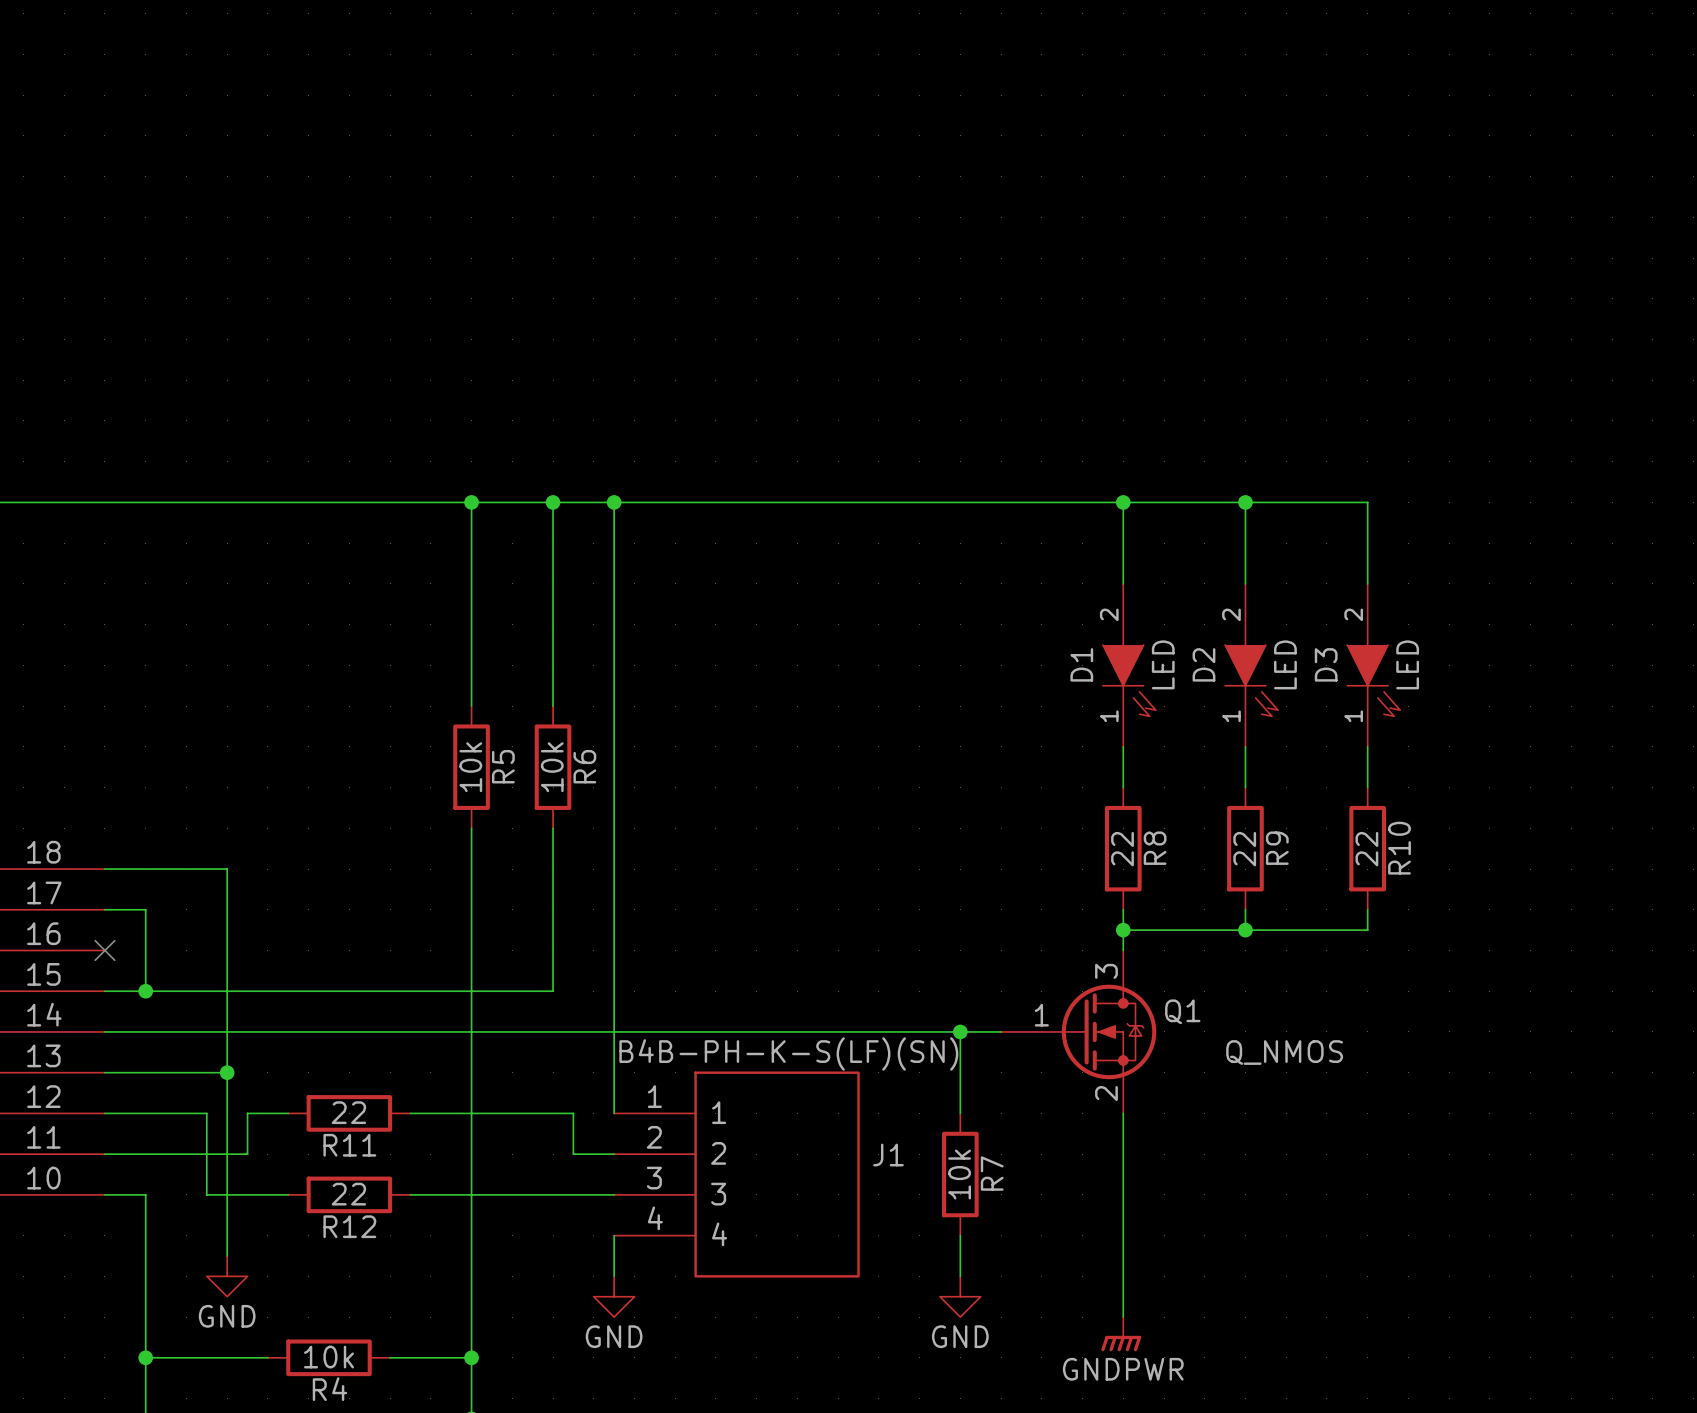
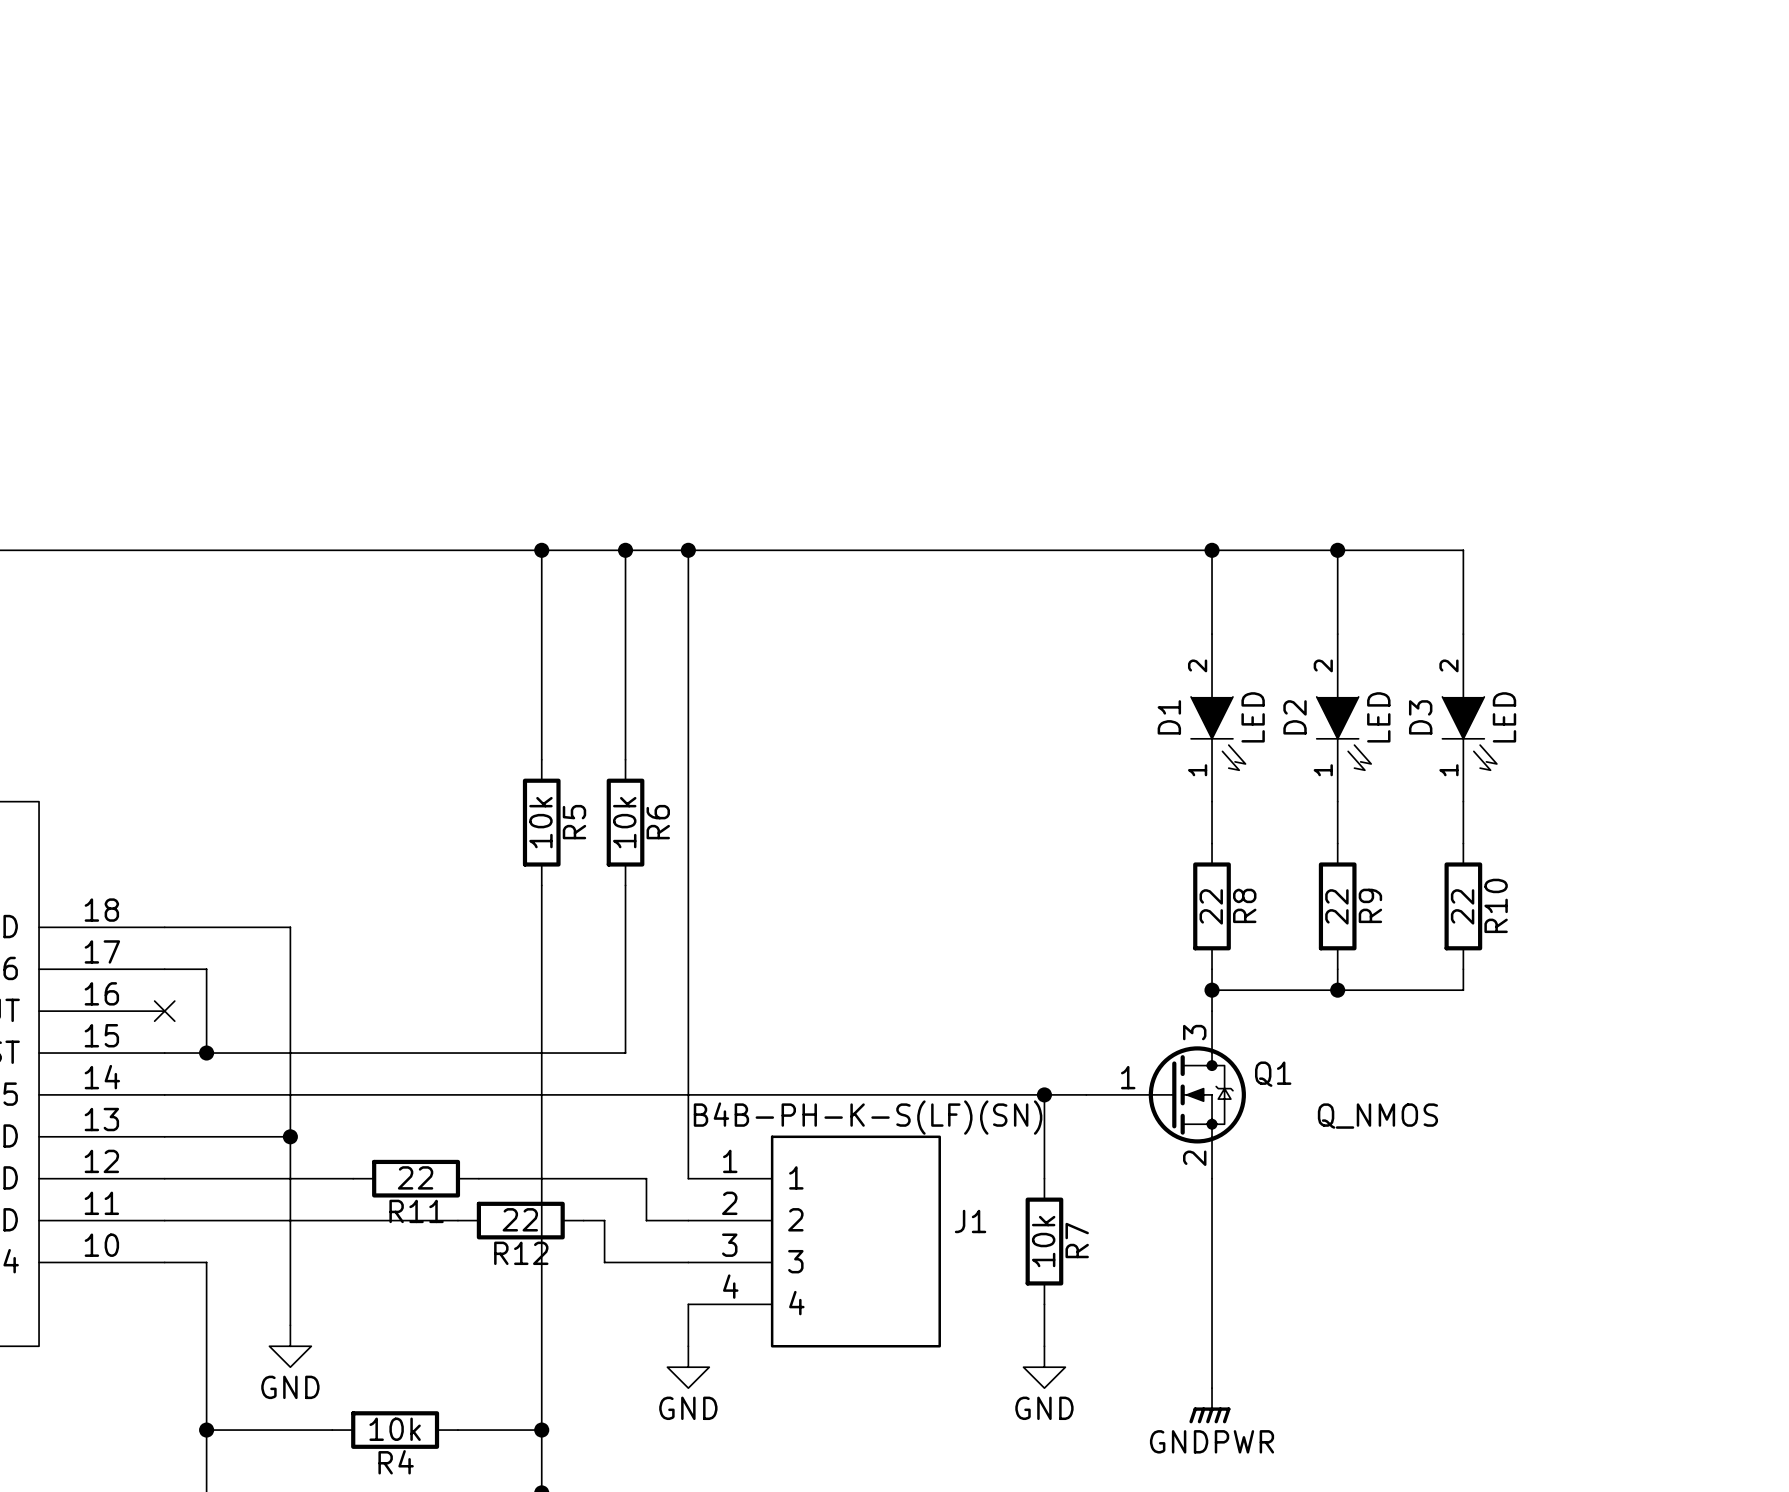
wire: (206, 1113) (206, 1194) (288, 1194) -> none
wire: (247, 1113) (247, 1154) -> (311, 1178) (269, 1178)
wire: none -> (311, 1220) (457, 1220)
R12 position: (349, 1194) -> (520, 1220)
wire: (410, 1194) (532, 1194) -> (583, 1220) (604, 1220) (604, 1262)

